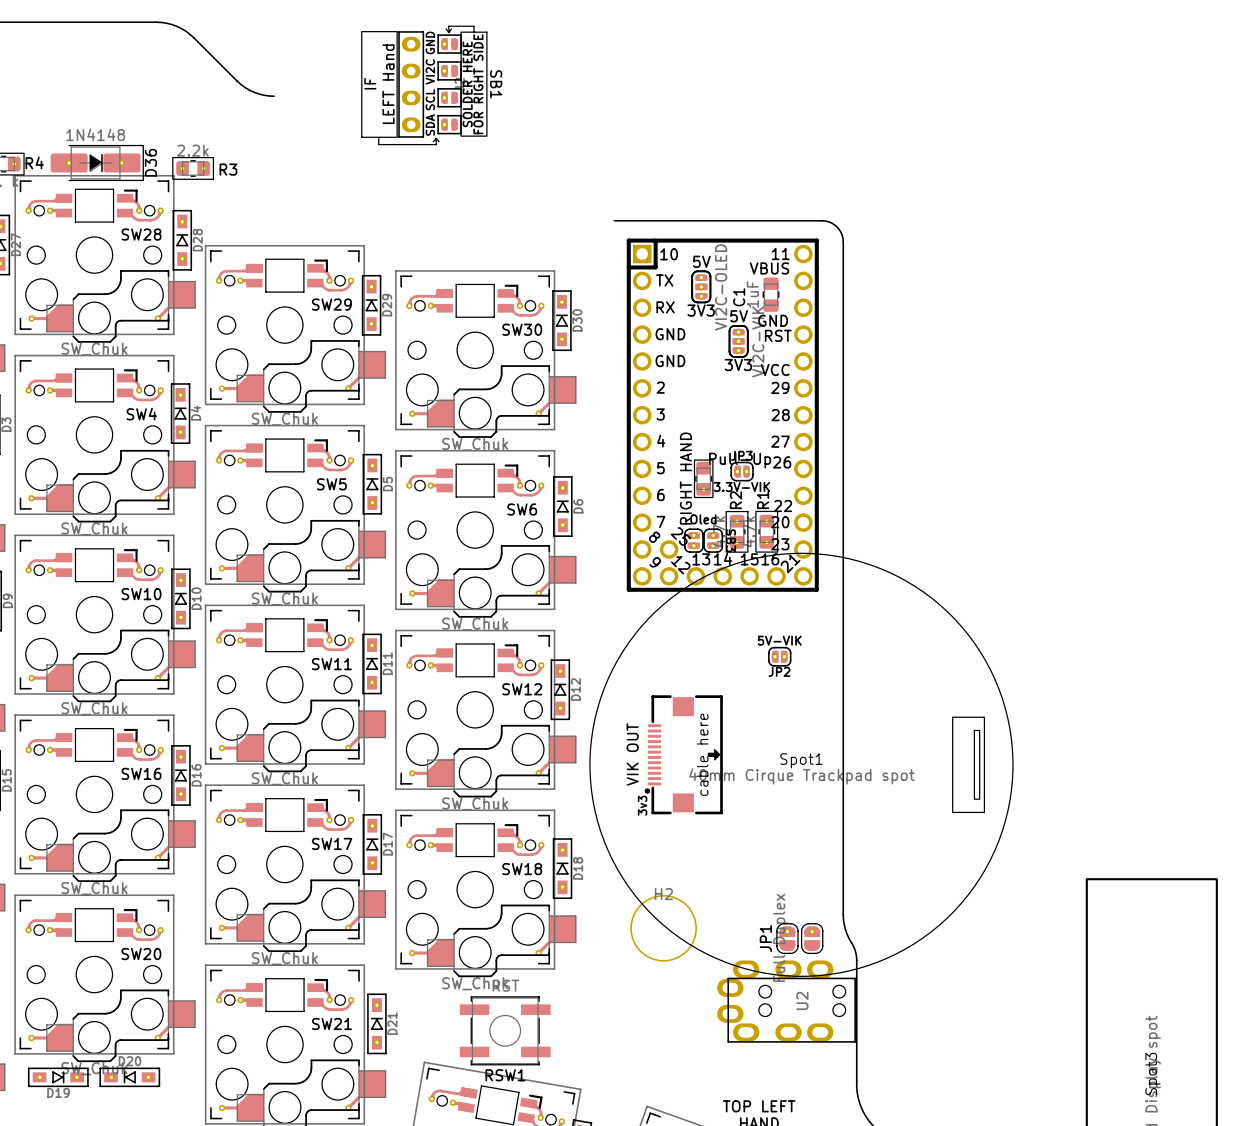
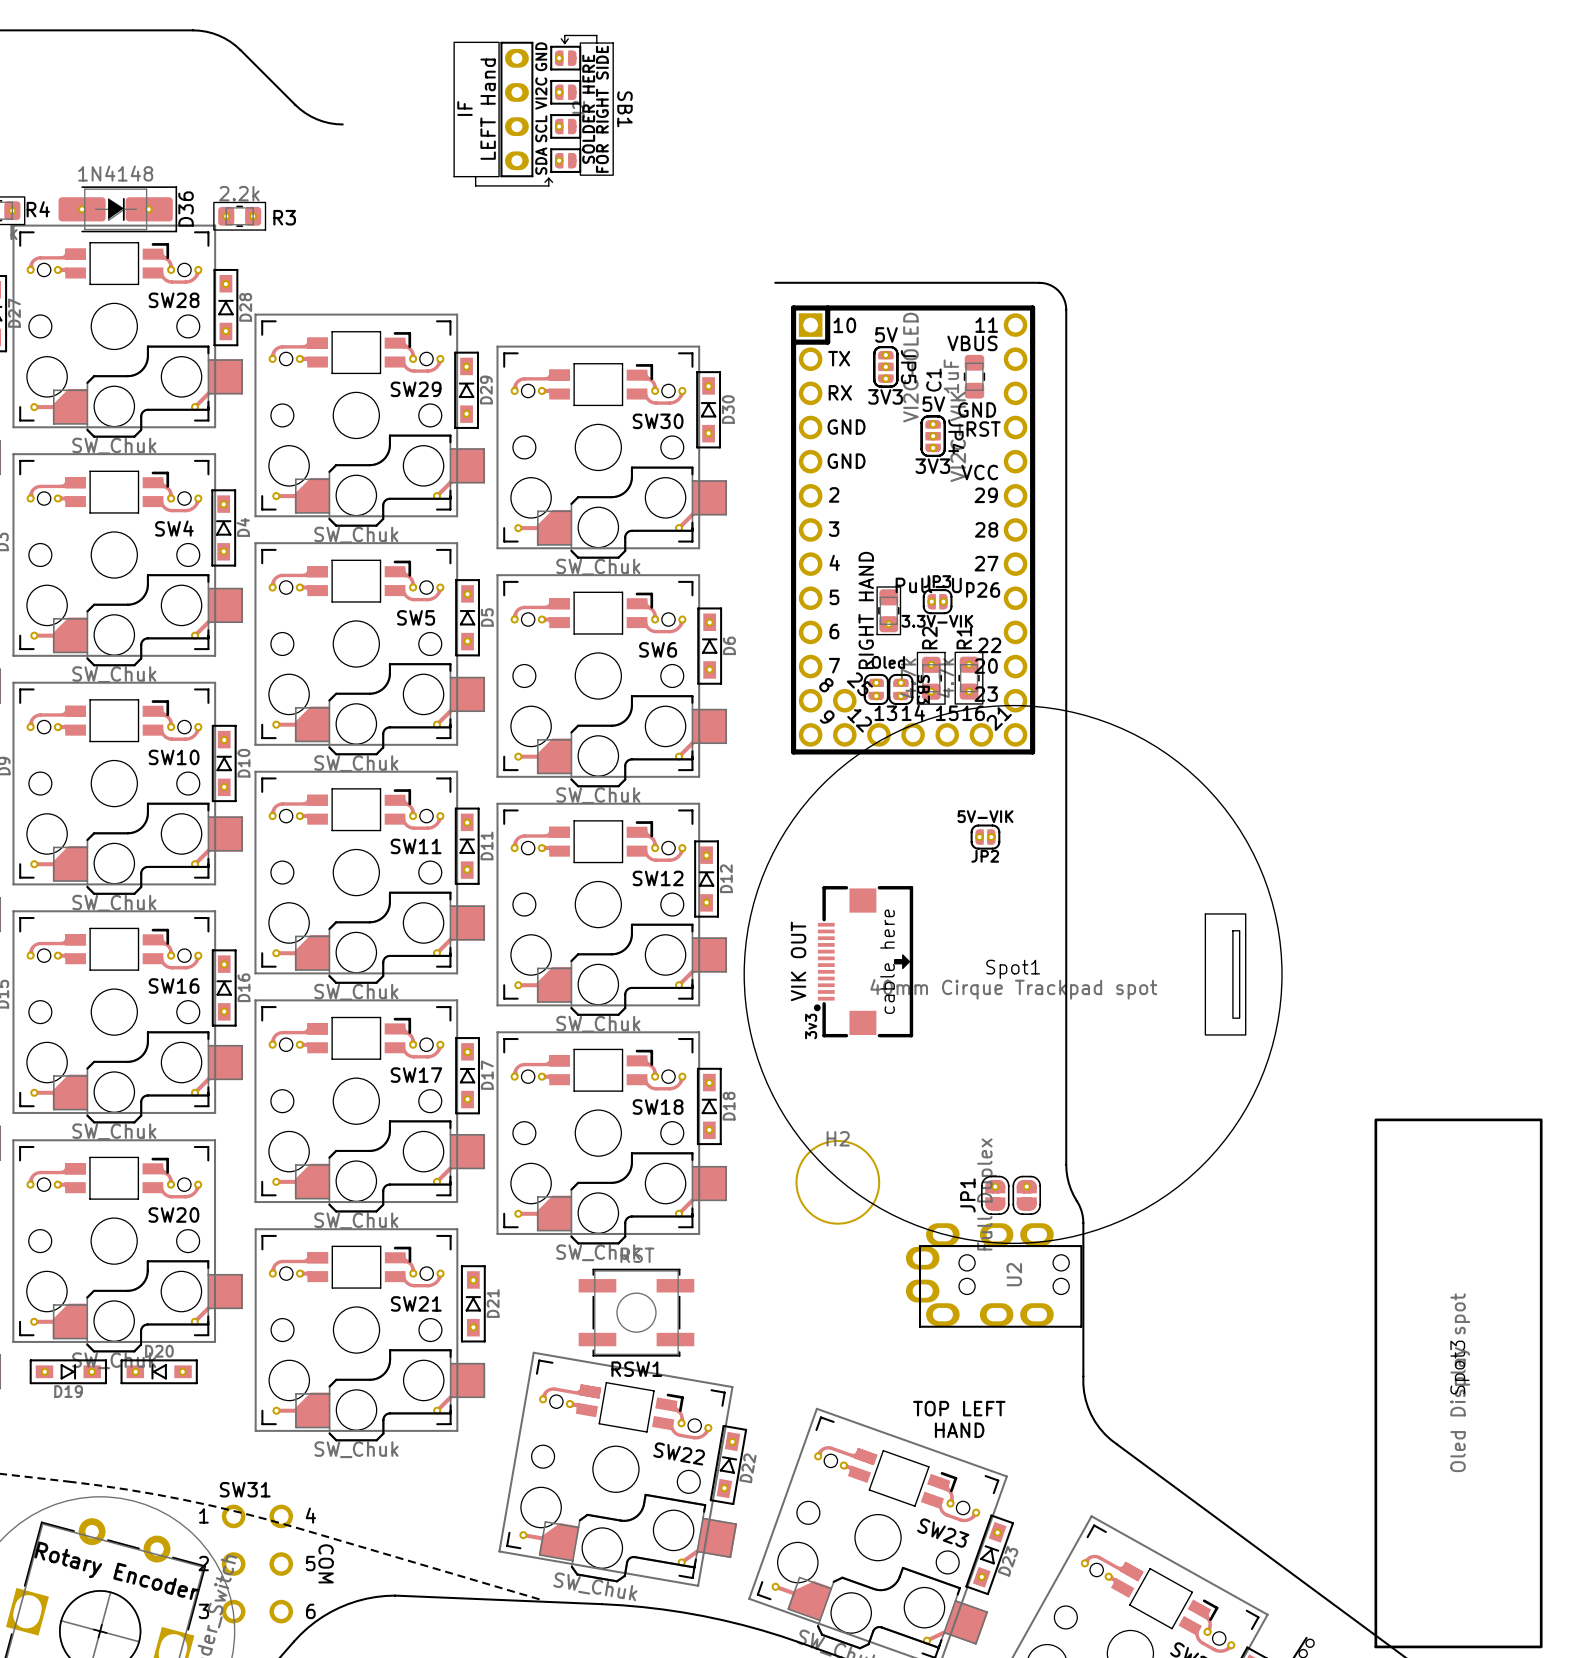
part text: none -> JP5 (908, 367)
part text: none -> JP4 (956, 436)

